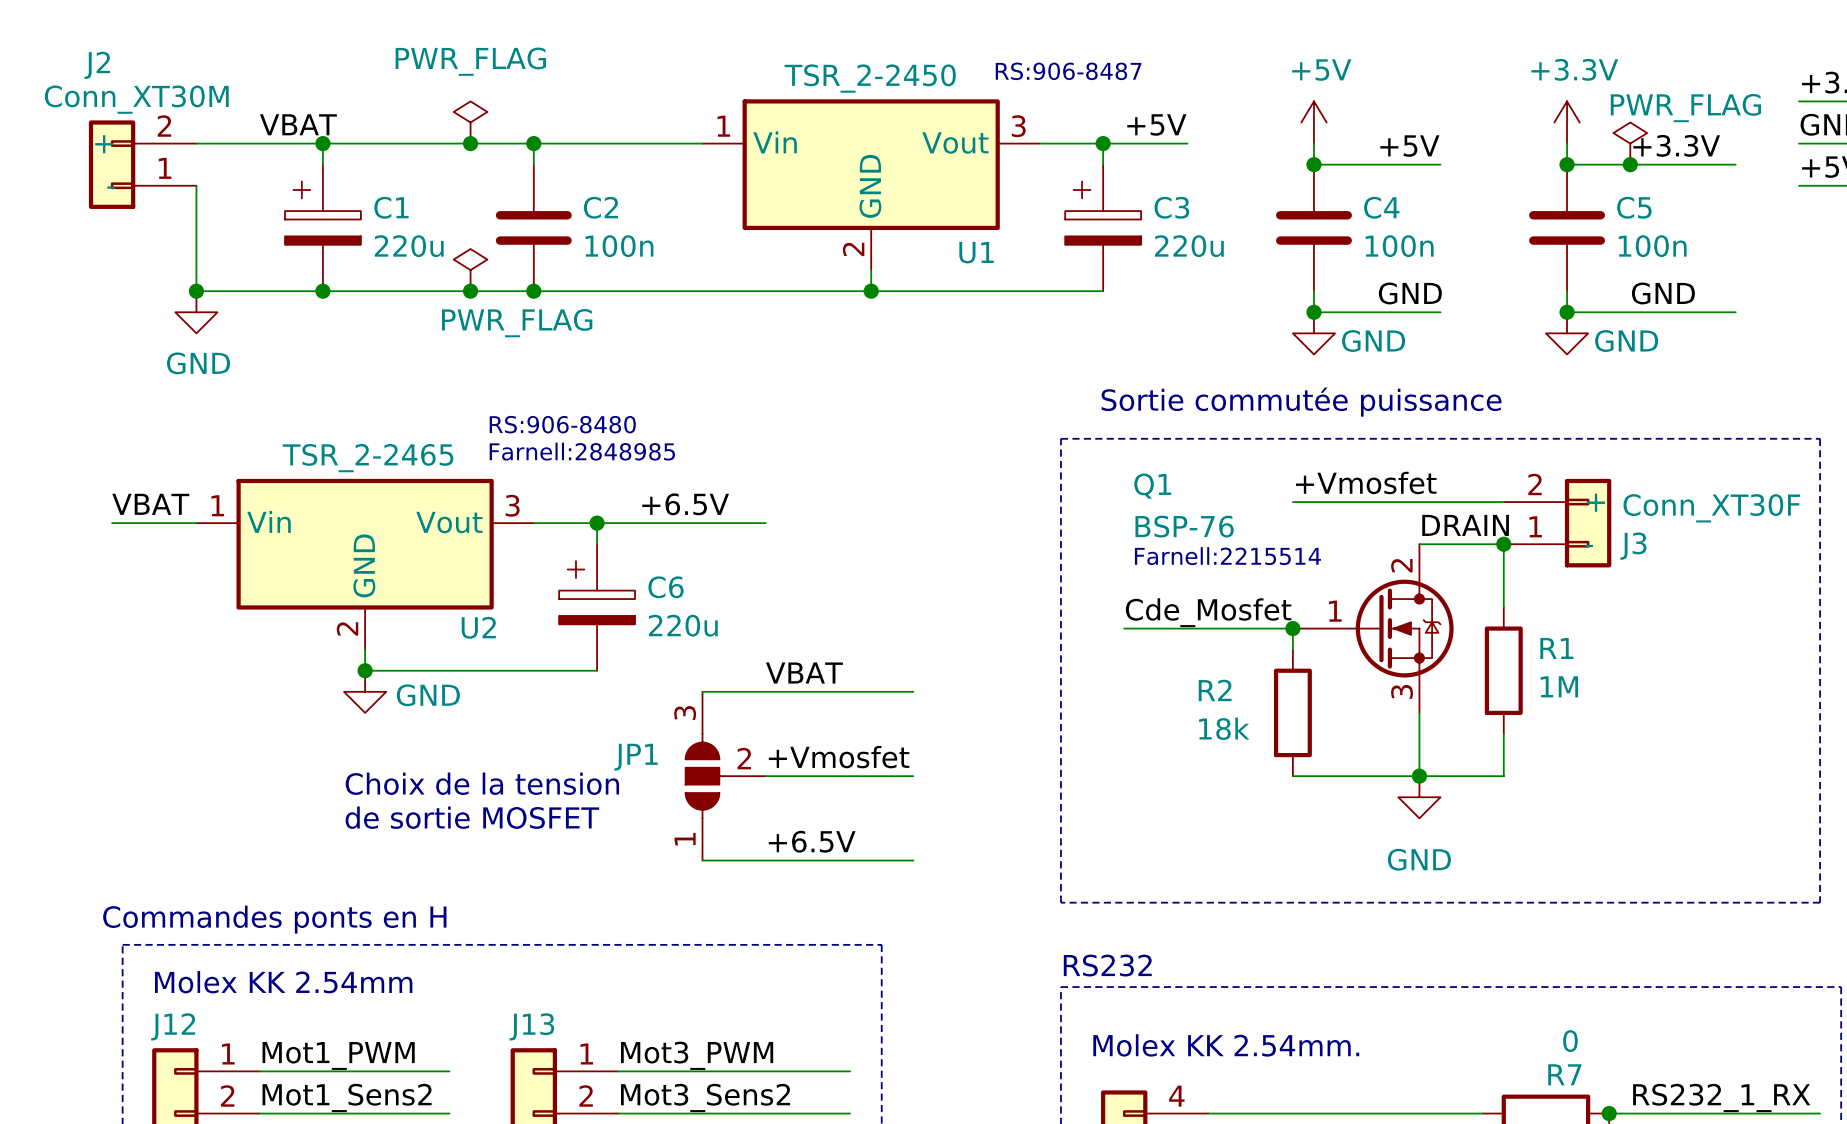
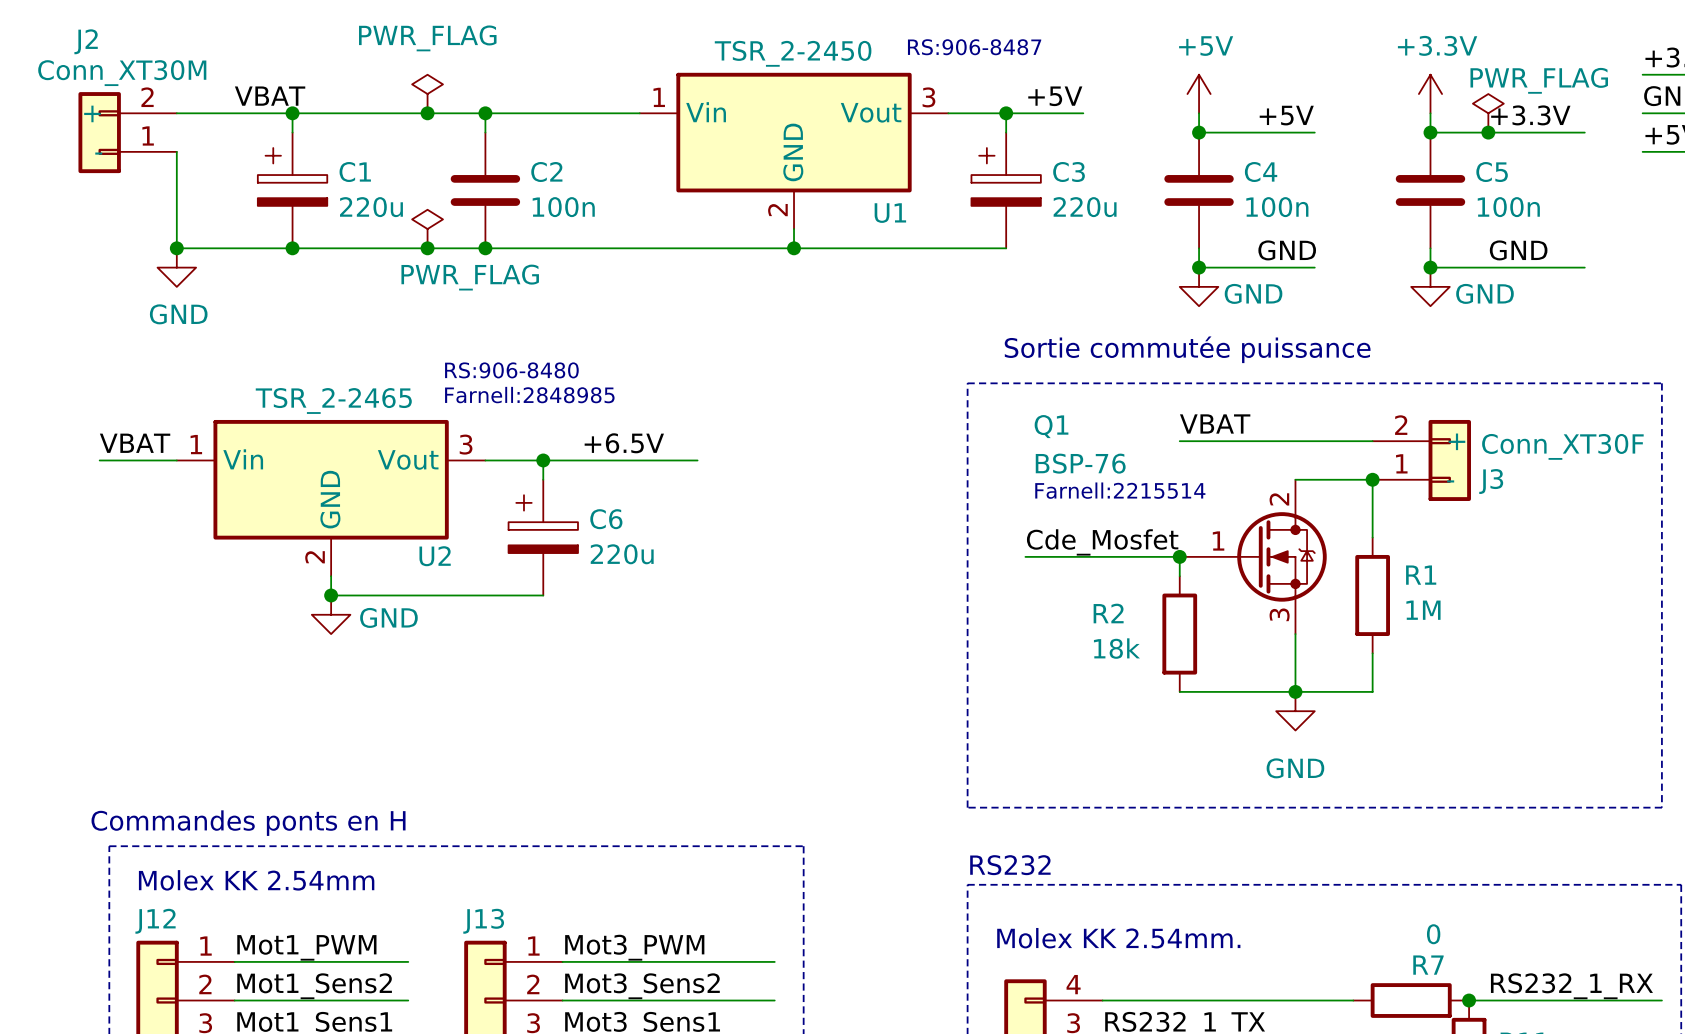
label: +Vmosfet (1366, 482) -> VBAT (1215, 423)
label: DRAIN (1465, 525) -> none
label: VBAT (804, 673) -> none
wire: (702, 691) (913, 691) -> none
label: +Vmosfet (839, 757) -> none
JP1: (725, 776) -> none
wire: (765, 776) (913, 776) -> none
text: Choix de la tension (482, 783) -> none
text: de sortie MOSFET (472, 817) -> none
label: +6.5V (812, 841) -> none
wire: (702, 860) (913, 860) -> none

